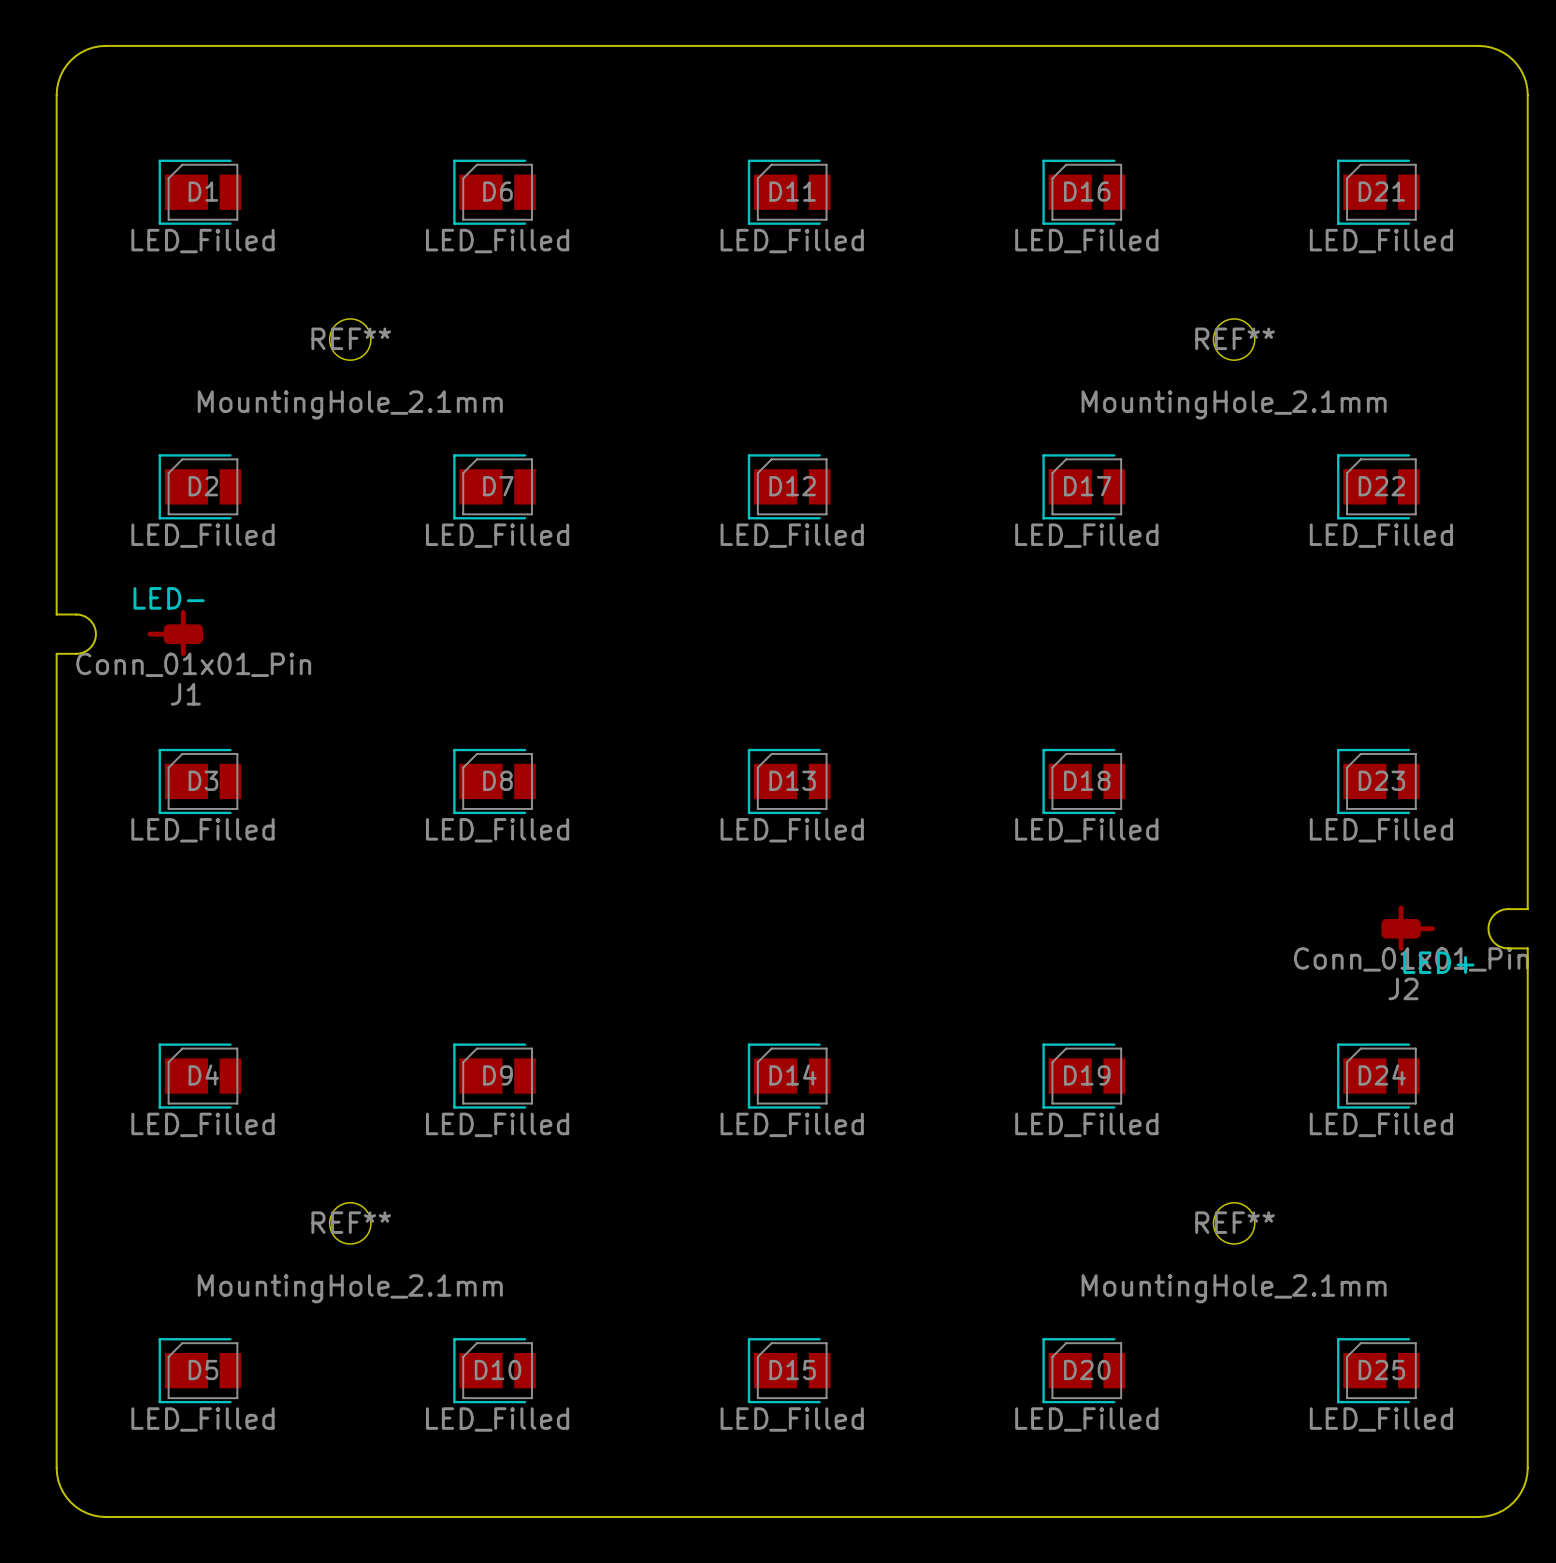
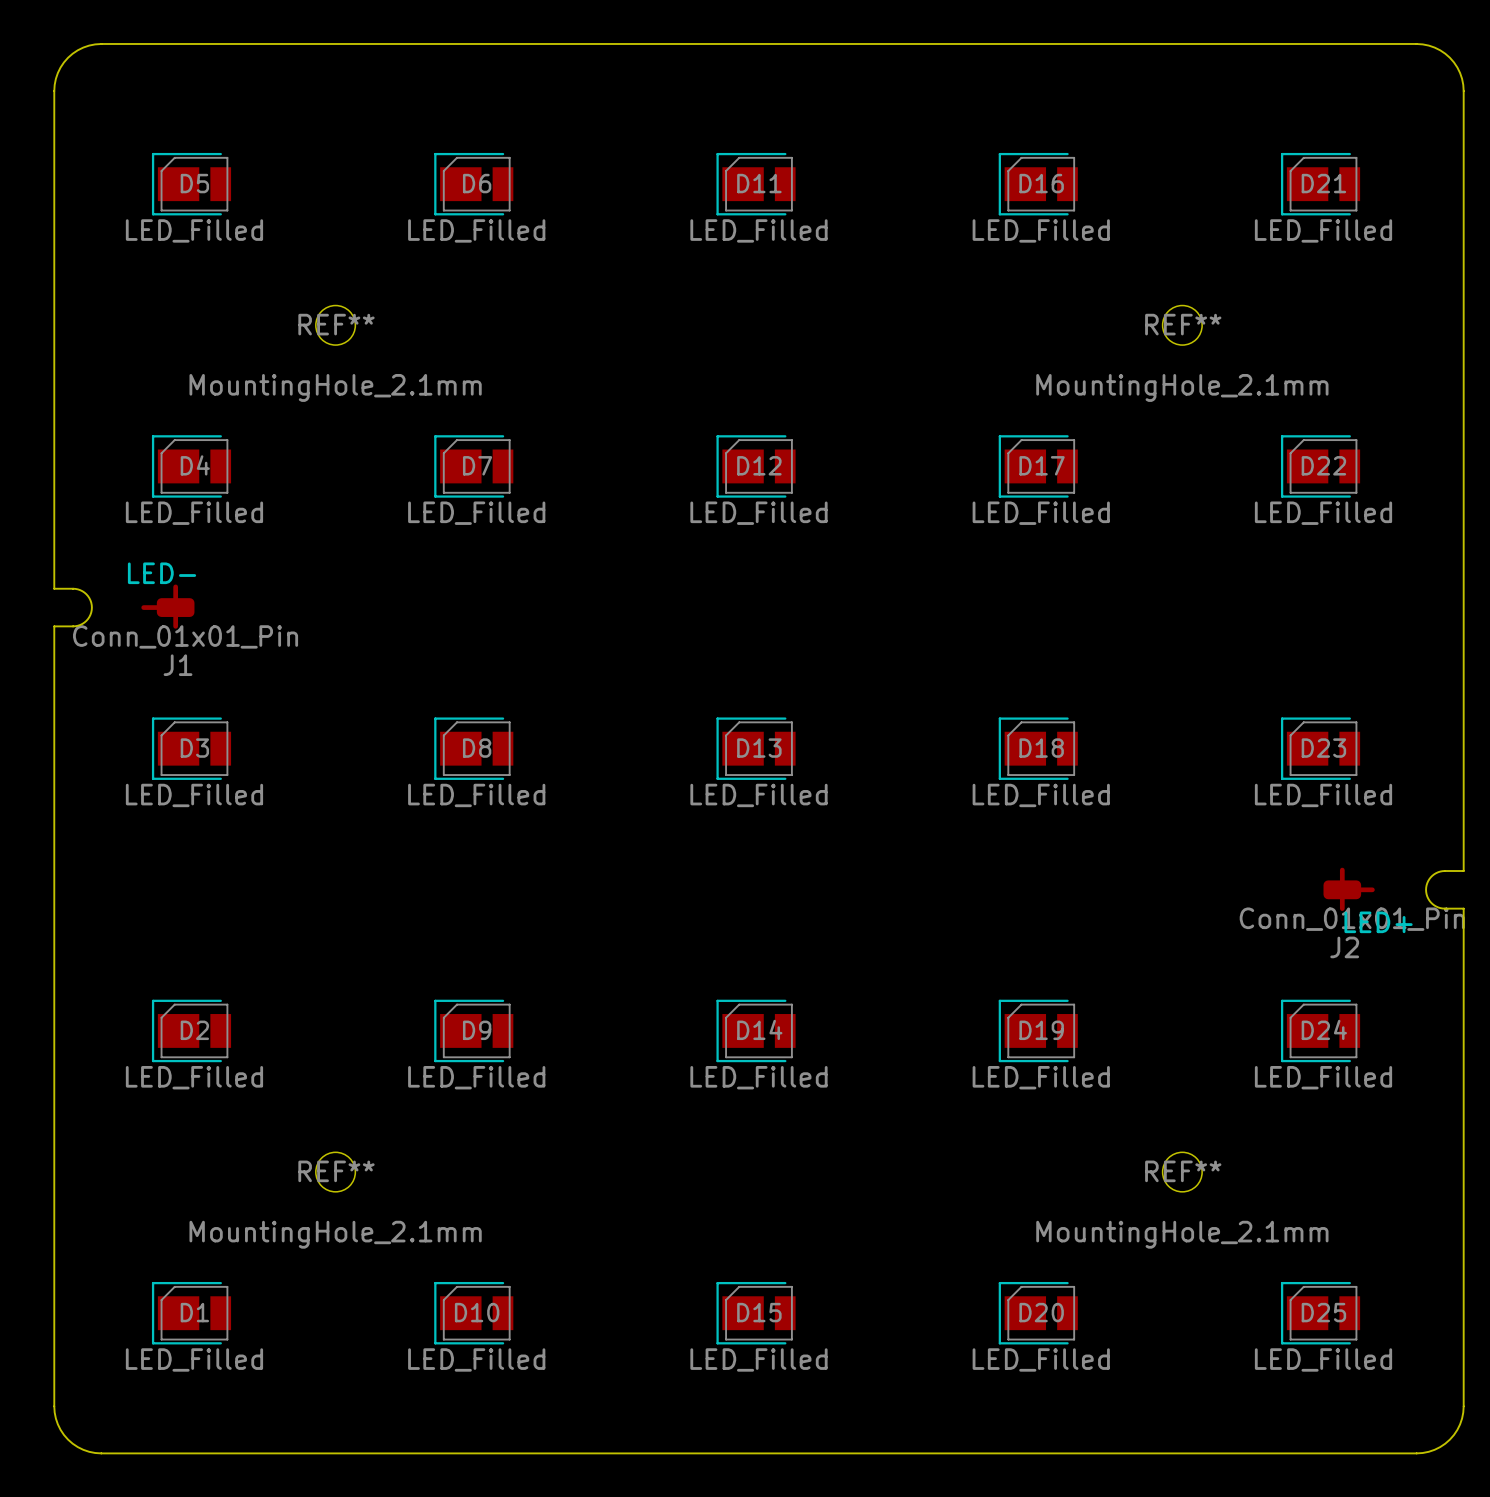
D1 name: D1 (203, 191) -> D5 (194, 183)
D2 name: D2 (203, 486) -> D4 (195, 465)
D4 name: D4 (203, 1074) -> D2 (194, 1030)
D5 name: D5 (203, 1370) -> D1 (194, 1312)

